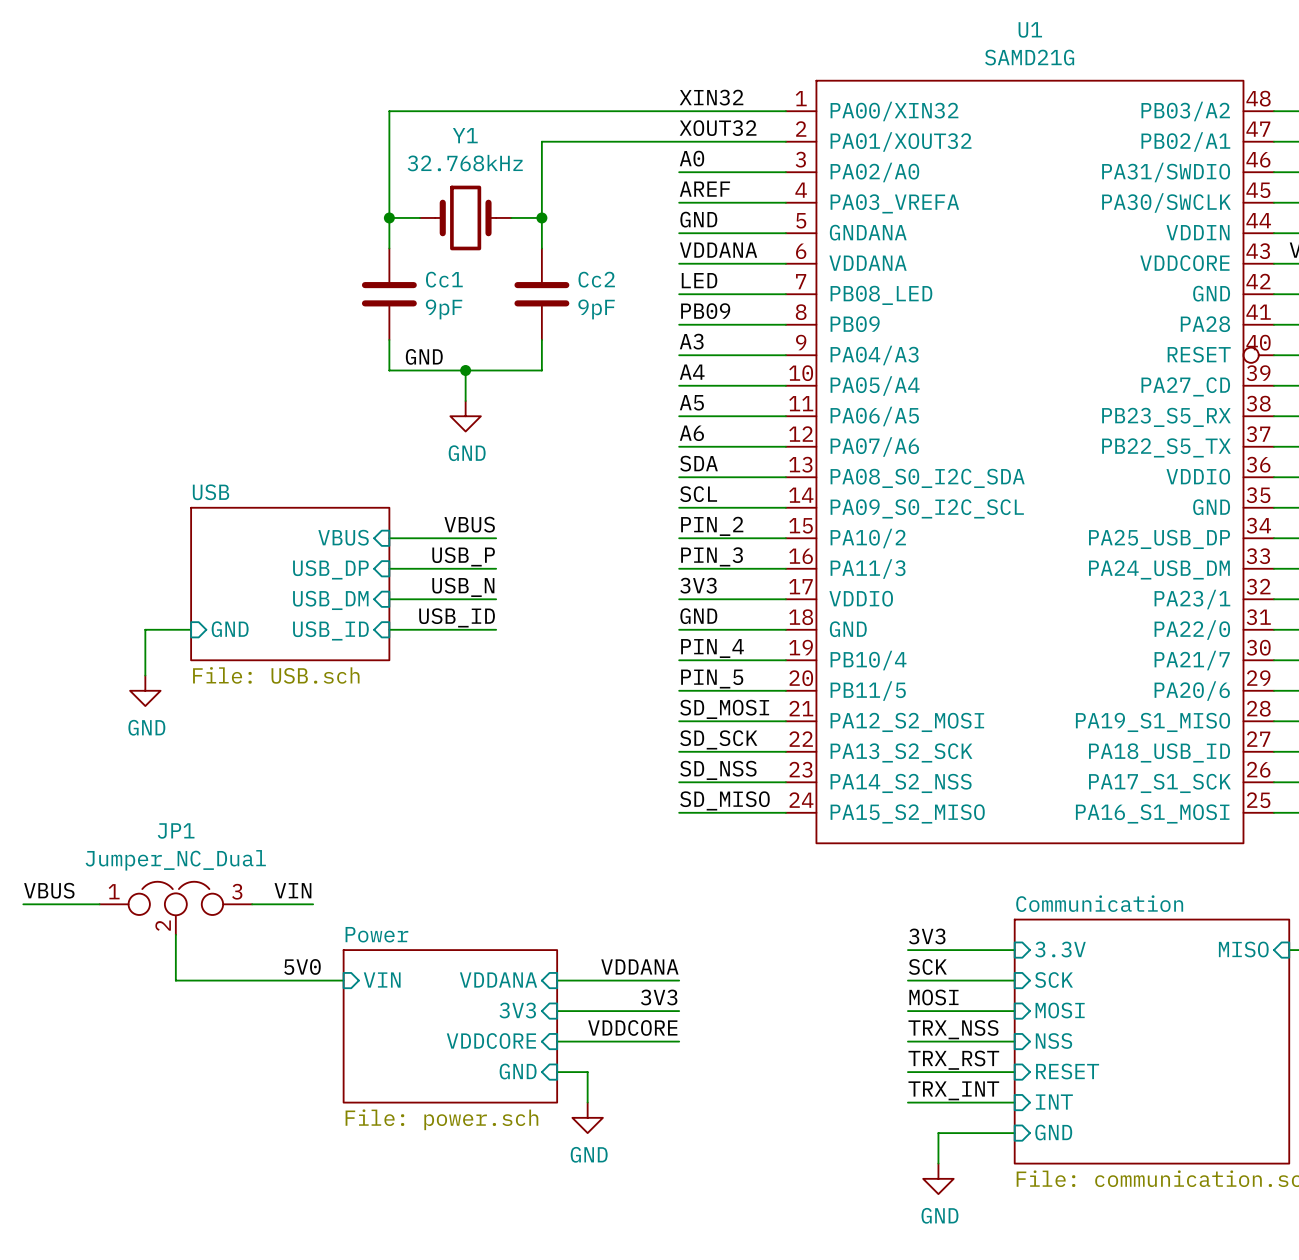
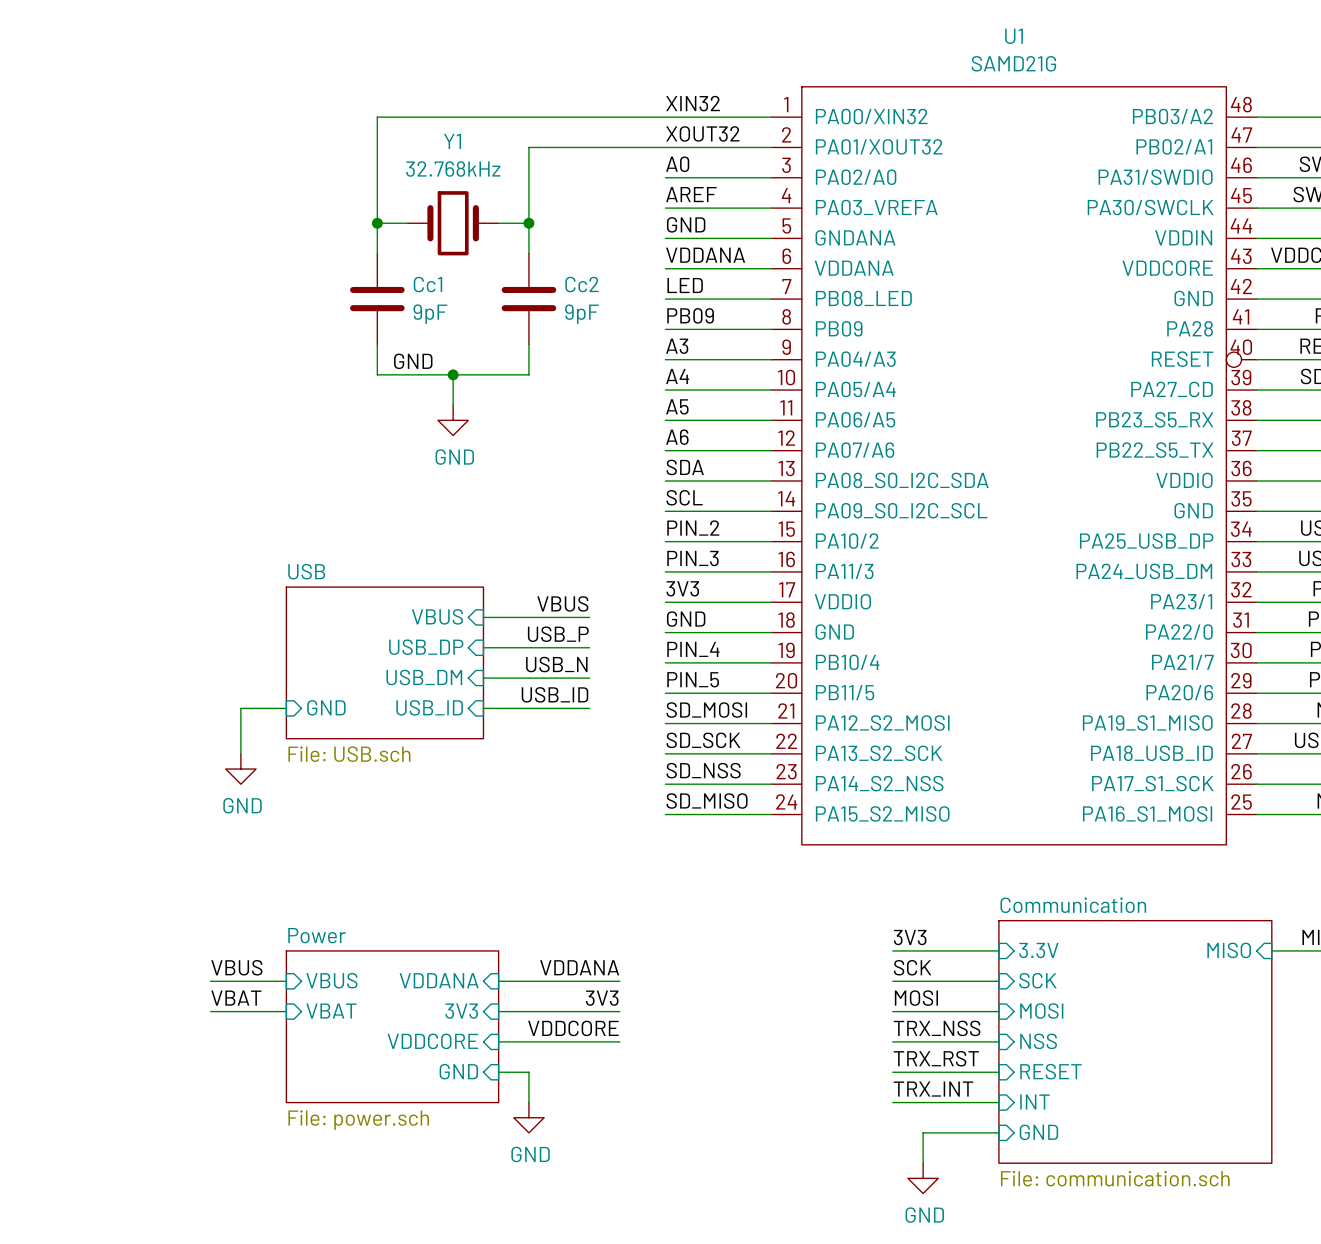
label position: VBUS (469, 524) -> VBUS (562, 603)
sheet pin position: VBUS (343, 537) -> VBUS (437, 616)
wire: (389, 538) (496, 538) -> (483, 617) (589, 617)
label position: USB_P (463, 556) -> USB_P (558, 634)
wire: (389, 568) (496, 568) -> (483, 647) (589, 647)
sheet pin position: USB_DP (330, 569) -> USB_DP (426, 647)
sheet USB position: (290, 584) -> (384, 662)
label position: USB_N (463, 587) -> USB_N (556, 664)
wire: (389, 599) (496, 599) -> (483, 678) (589, 678)
sheet pin position: USB_DM (330, 600) -> USB_DM (424, 677)
label position: USB_ID (457, 617) -> USB_ID (554, 694)
wire: (191, 629) (145, 629) (145, 675) -> (286, 708) (240, 708) (240, 753)
sheet pin position: GND (230, 629) -> GND (326, 707)
wire: (389, 629) (496, 629) -> (483, 708) (589, 708)
sheet pin position: USB_ID (330, 630) -> USB_ID (429, 707)
power symbol position: GND (145, 690) -> GND (240, 769)
label position: VBUS (49, 890) -> VBUS (236, 967)
label: VIN (292, 890) -> none
wire: (23, 904) (99, 904) -> (210, 1011) (286, 1011)
wire: (252, 904) (313, 904) -> none
JP1: Jumper_NC_Dual (175, 908) -> none
wire: (175, 934) (175, 980) (221, 980) -> none
label: 5V0 (302, 966) -> none
label position: VDDANA (639, 966) -> VDDANA (579, 967)
wire: (297, 980) (343, 980) -> none
sheet pin: none -> VBUS (331, 980)
sheet pin: VIN (382, 980) -> none
sheet pin position: VDDANA (498, 980) -> VDDANA (439, 980)
wire: (633, 980) (679, 980) -> (498, 981) (544, 981)
label: none -> VBAT (236, 998)
label position: 3V3 (659, 997) -> 3V3 (602, 998)
sheet pin: none -> VBAT (331, 1011)
sheet pin position: 3V3 (517, 1010) -> 3V3 (461, 1011)
wire: (633, 1011) (679, 1011) -> (498, 1011) (544, 1011)
sheet Power position: (450, 1026) -> (392, 1026)
label position: VDDCORE (632, 1027) -> VDDCORE (573, 1028)
sheet pin position: VDDCORE (491, 1041) -> VDDCORE (432, 1041)
wire: (633, 1041) (679, 1041) -> (498, 1041) (544, 1041)
sheet pin position: GND (518, 1071) -> GND (458, 1071)
wire: (557, 1072) (587, 1072) (587, 1102) -> (498, 1072) (528, 1072) (528, 1102)
power symbol position: GND (587, 1117) -> GND (528, 1117)

